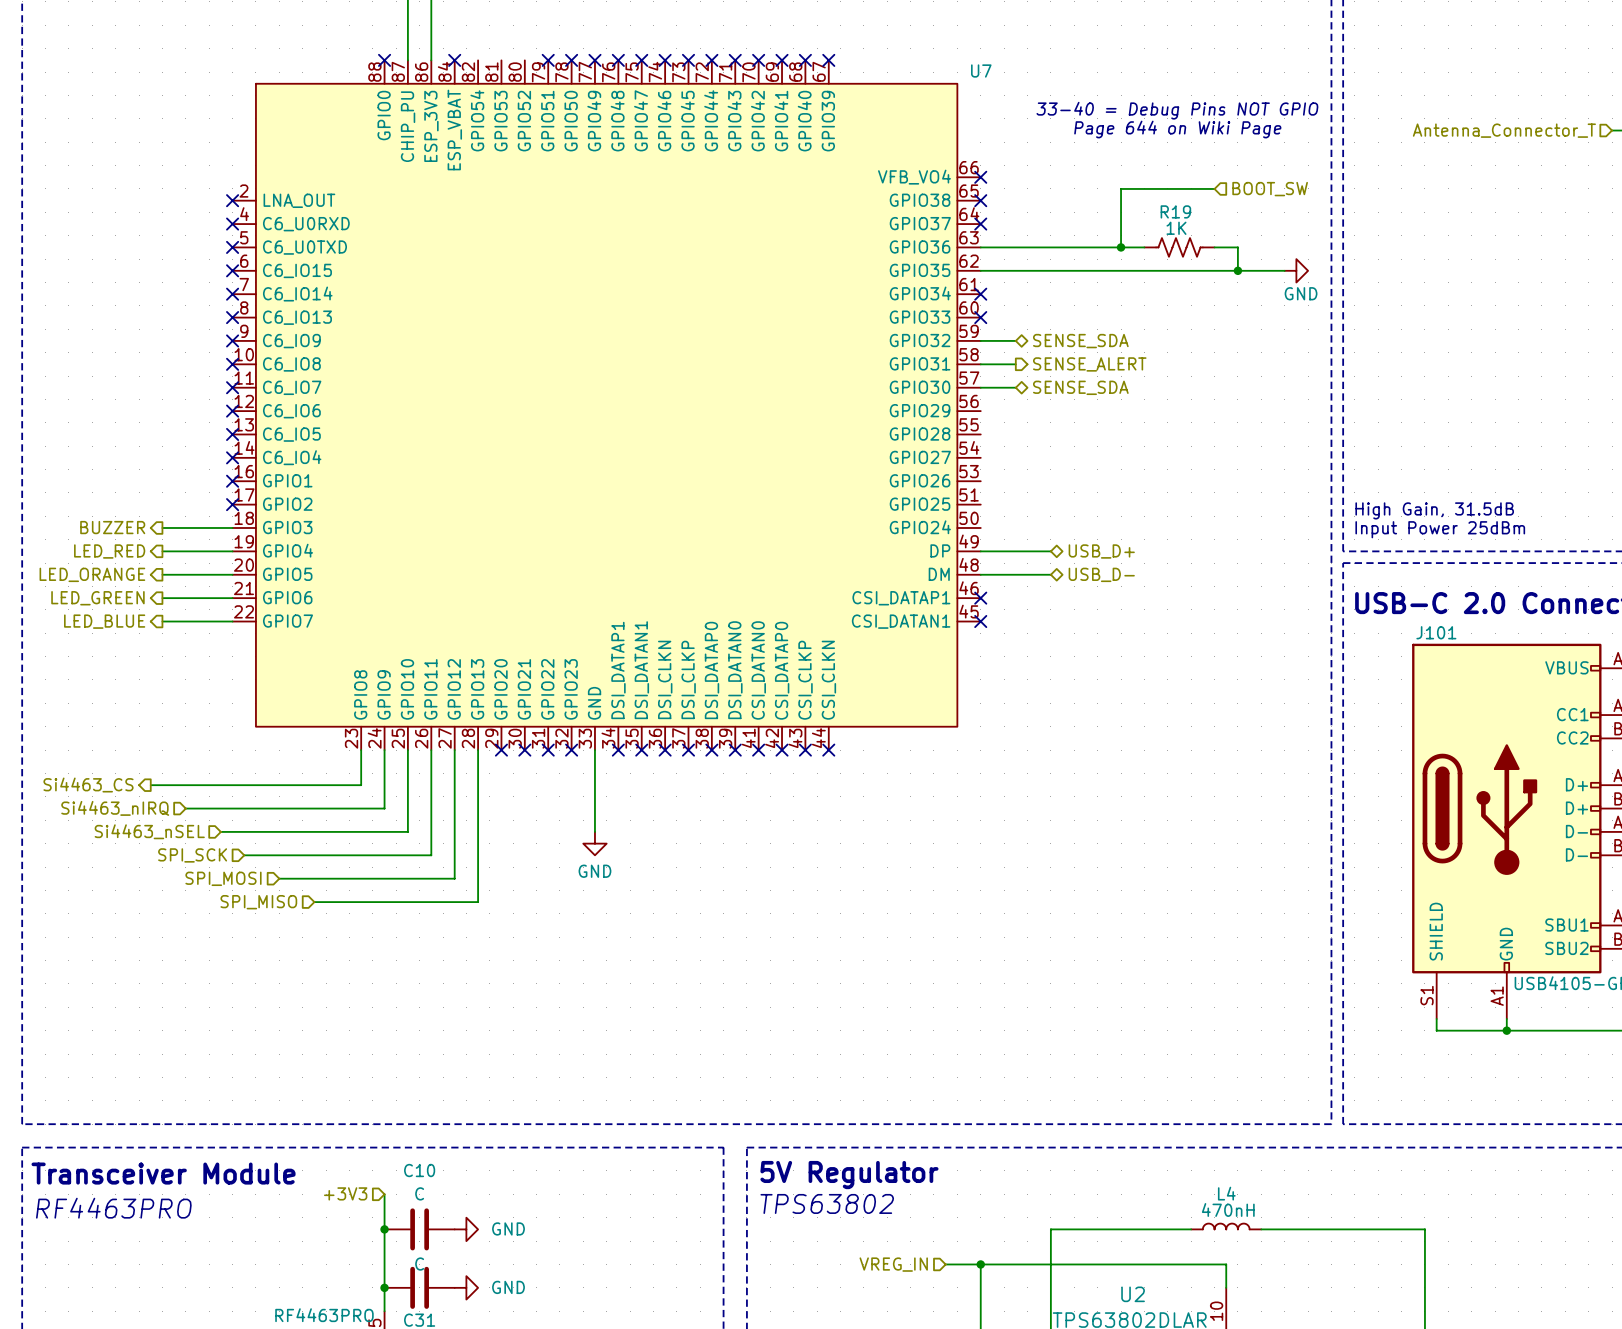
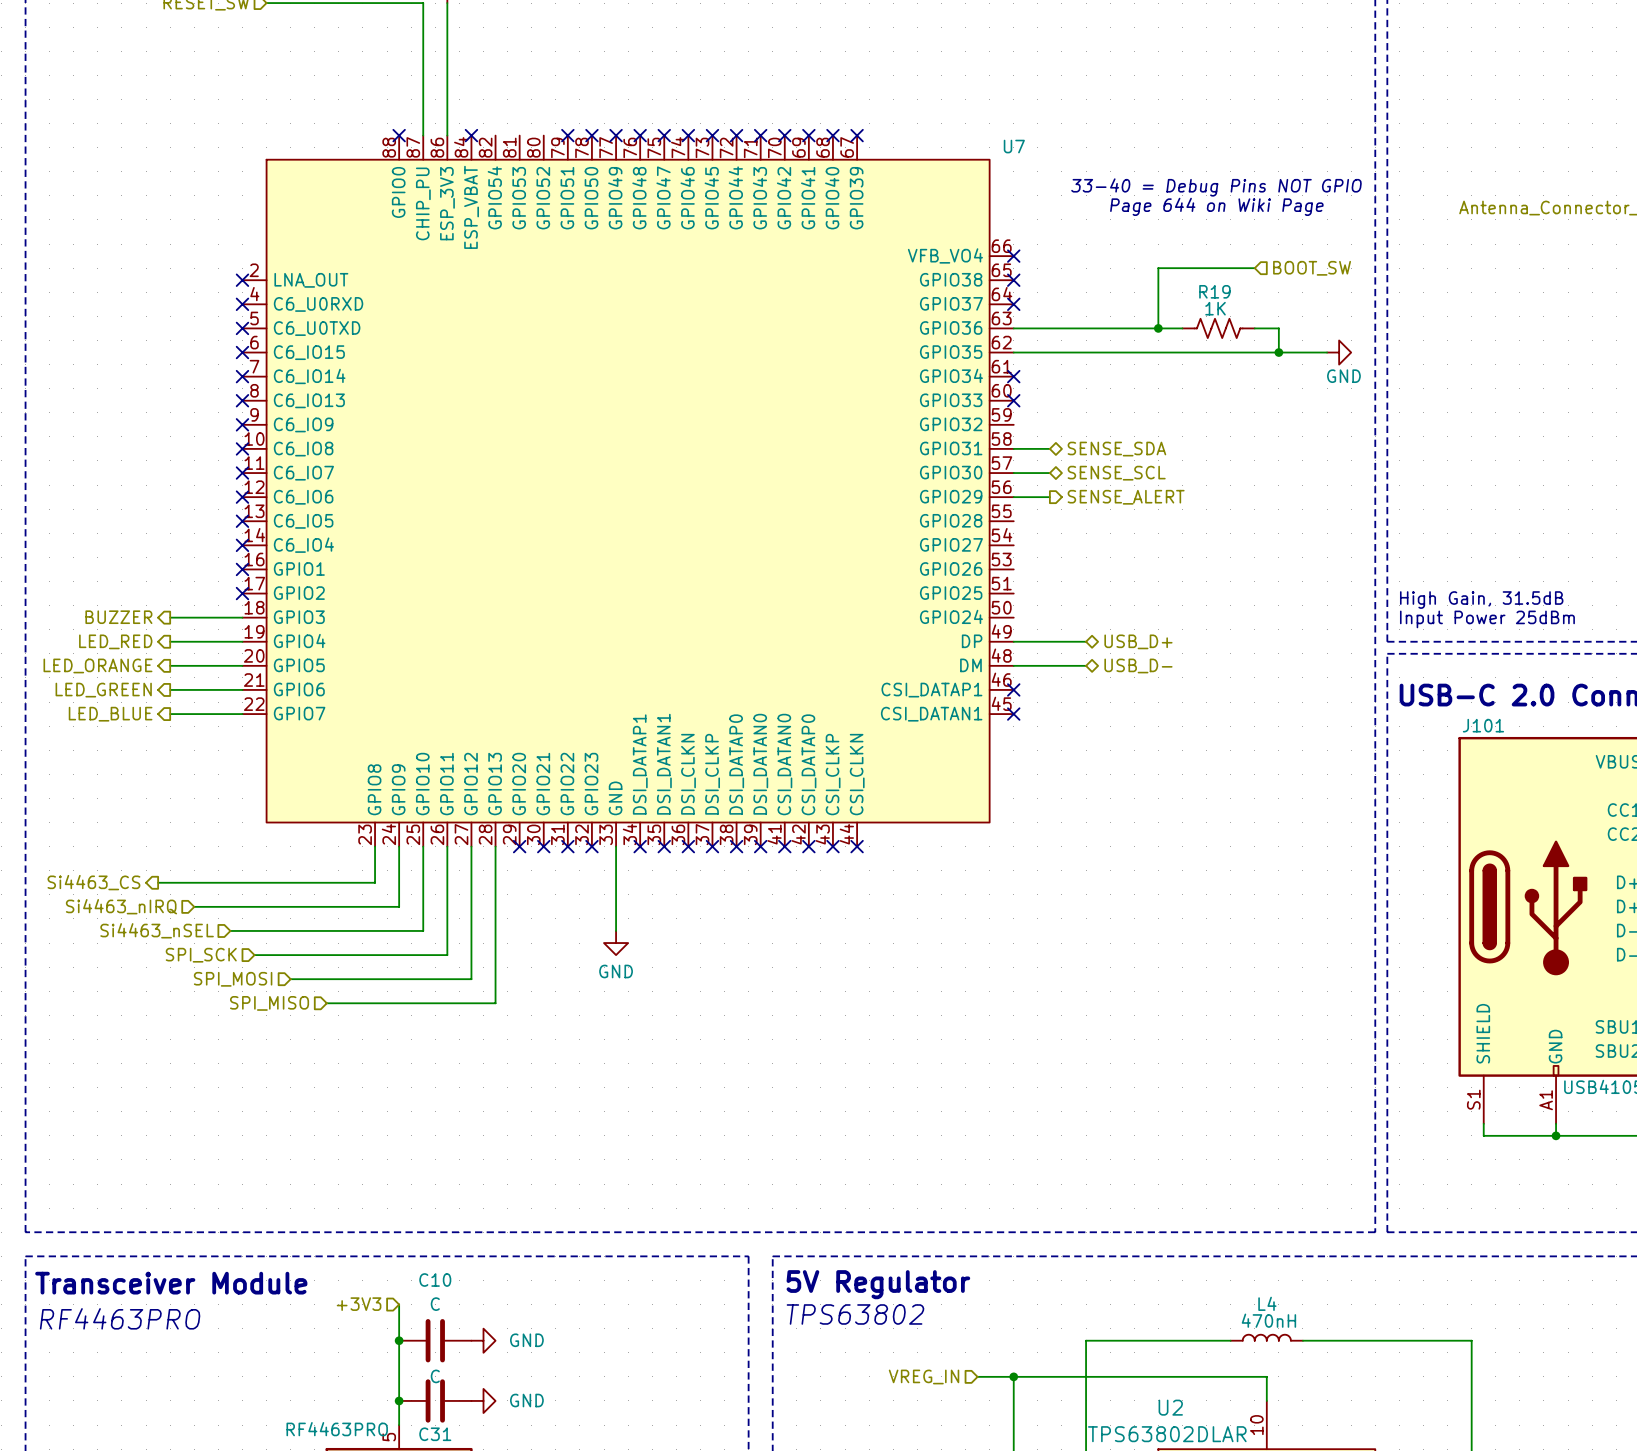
wire: (980, 340) (1015, 340) -> (1013, 497) (1049, 497)
hierarchical label: SENSE_SDA (1080, 341) -> none
hierarchical label shape: output (1089, 364) -> bidirectional (1116, 449)
hierarchical label: SENSE_ALERT (1089, 364) -> SENSE_SDA (1116, 449)
hierarchical label: SENSE_SDA (1080, 387) -> SENSE_SCL (1116, 473)
hierarchical label: none -> SENSE_ALERT (1126, 497)

